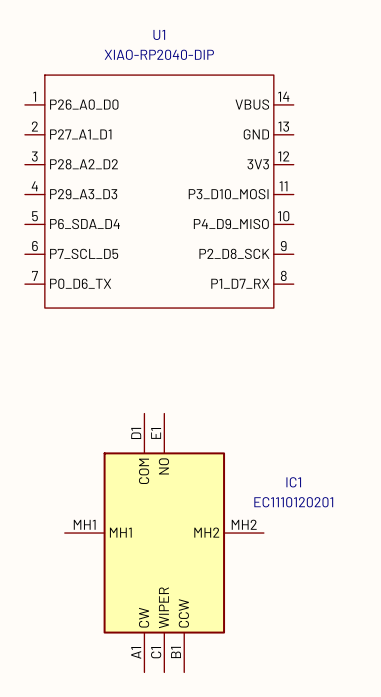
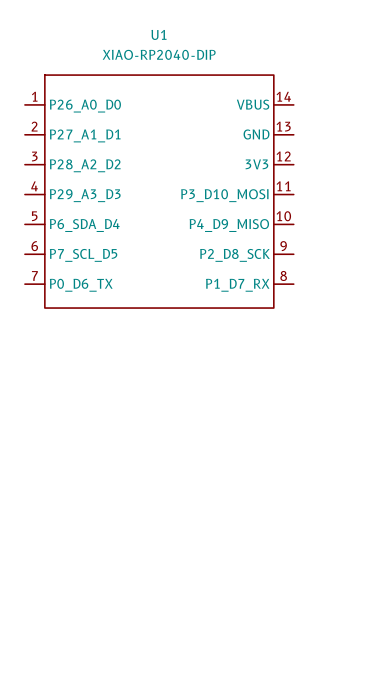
IC1: EC1110120201 (164, 542) -> none

